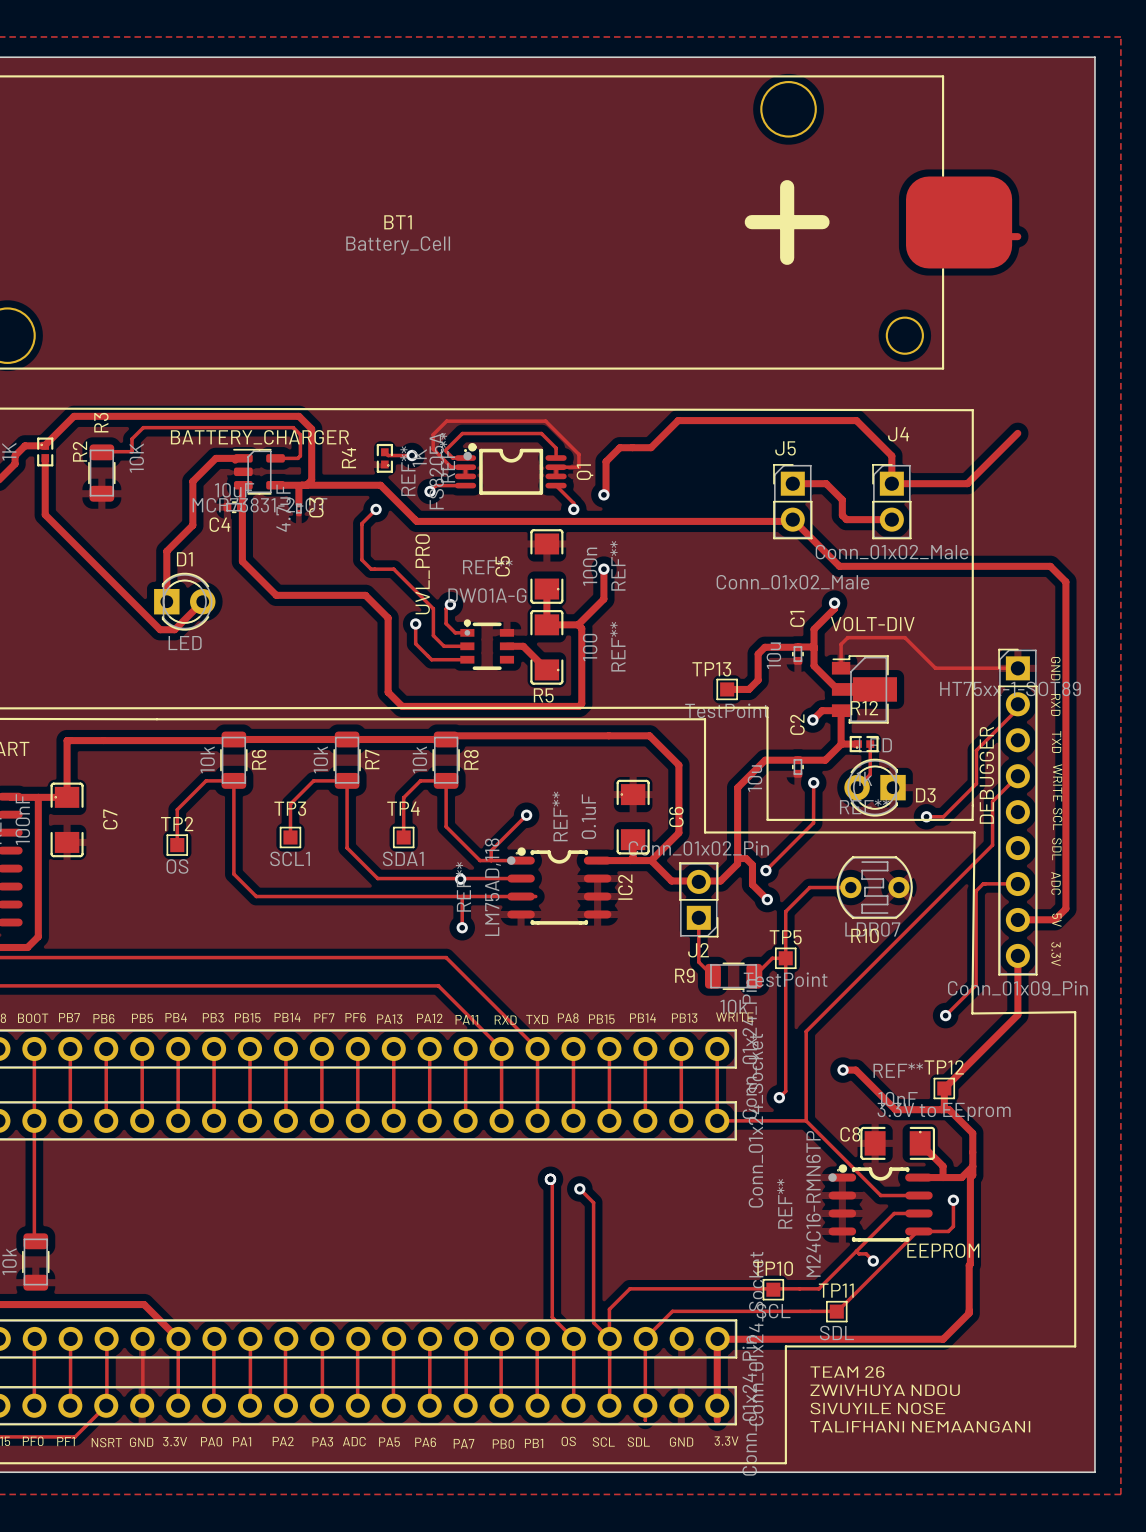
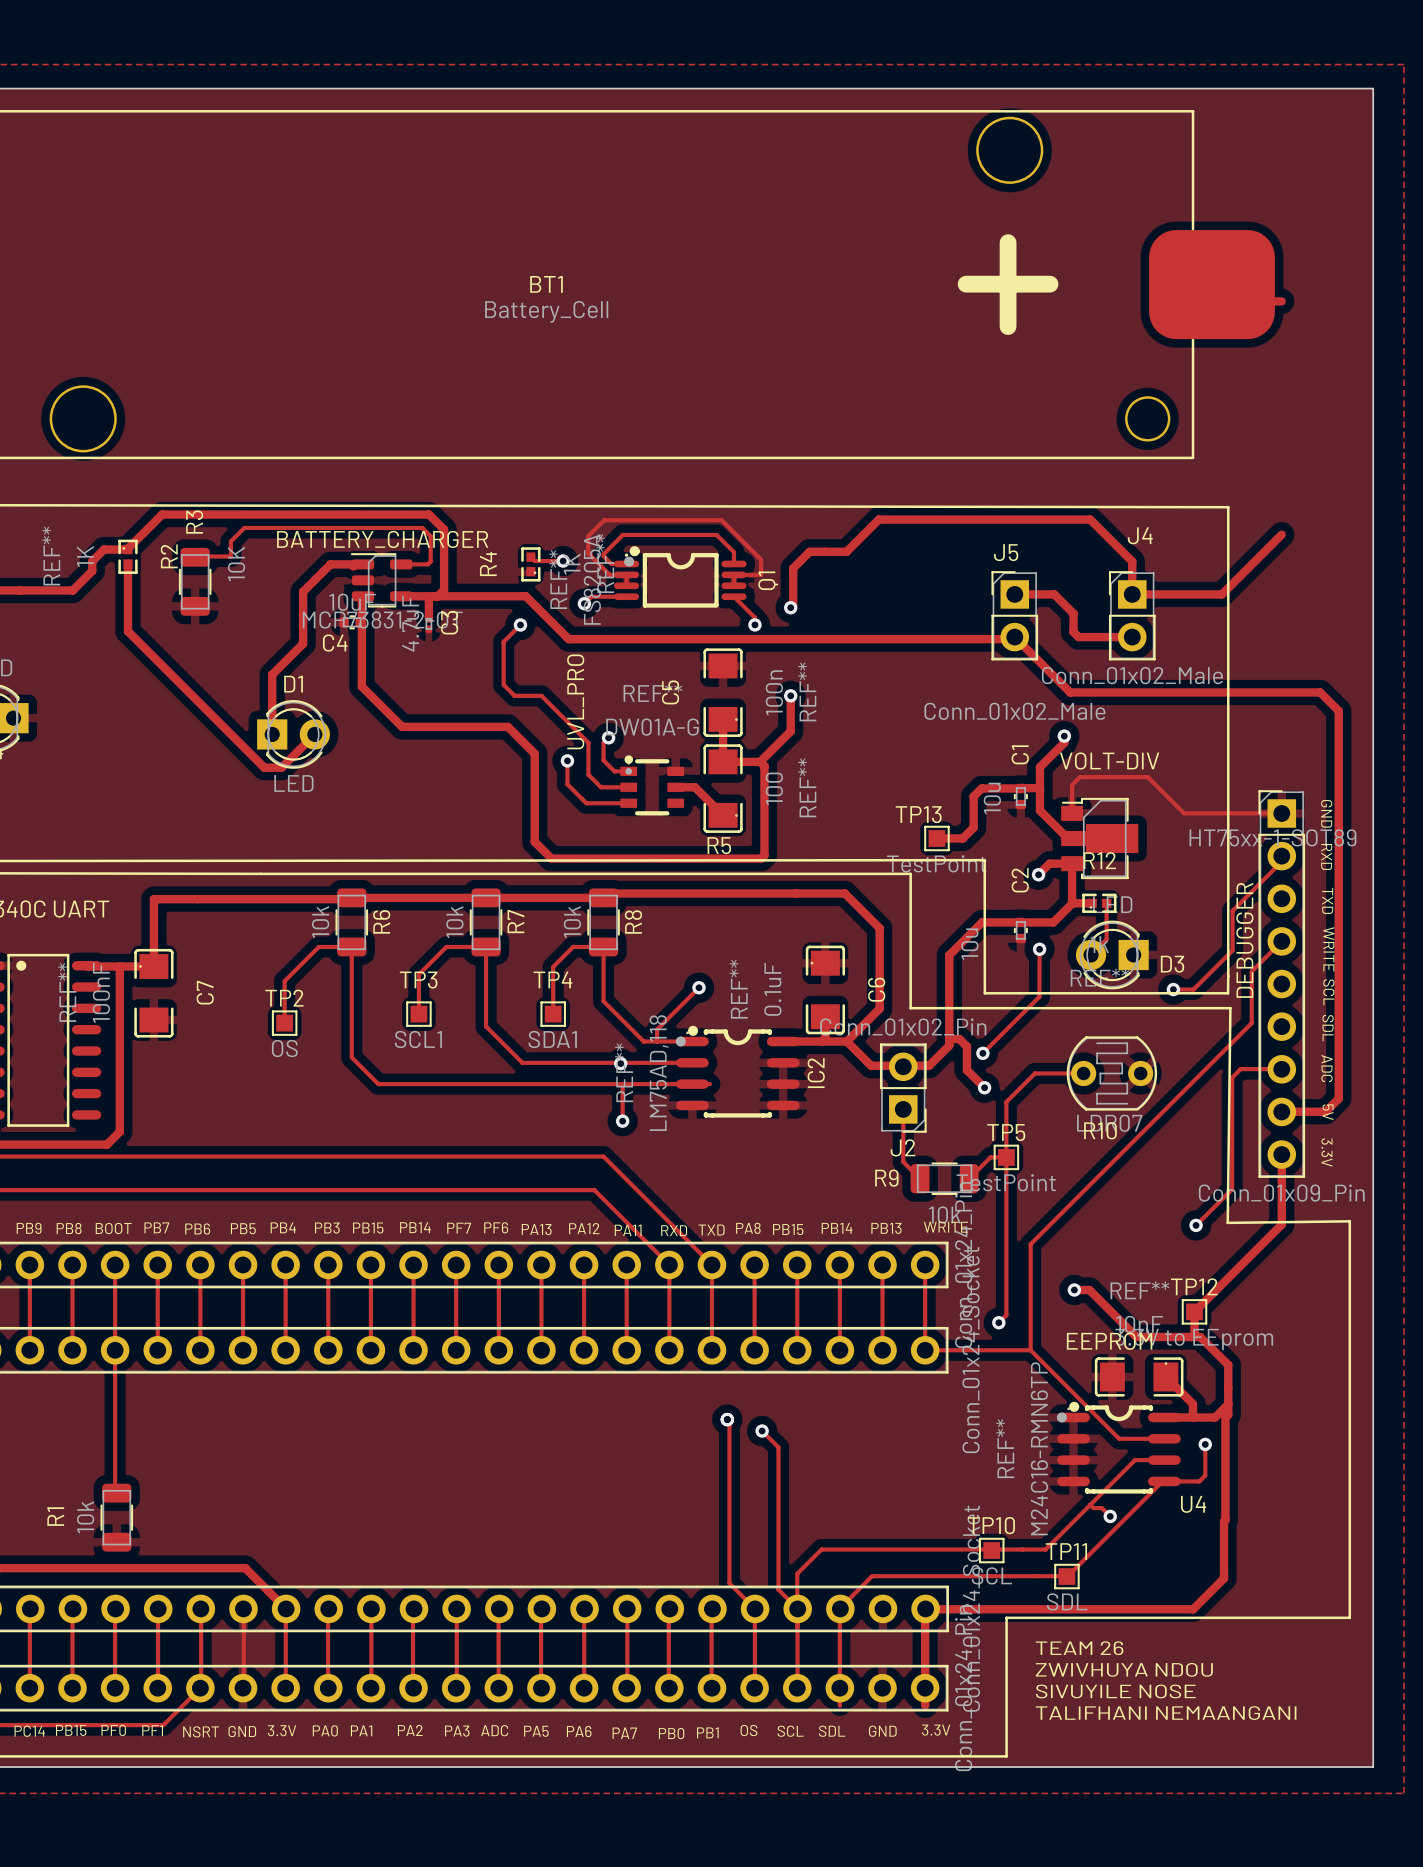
C8 name: C8 (850, 1134) -> EEPROM (1109, 1341)
EEPROM name: EEPROM (943, 1250) -> U4 (1193, 1504)

